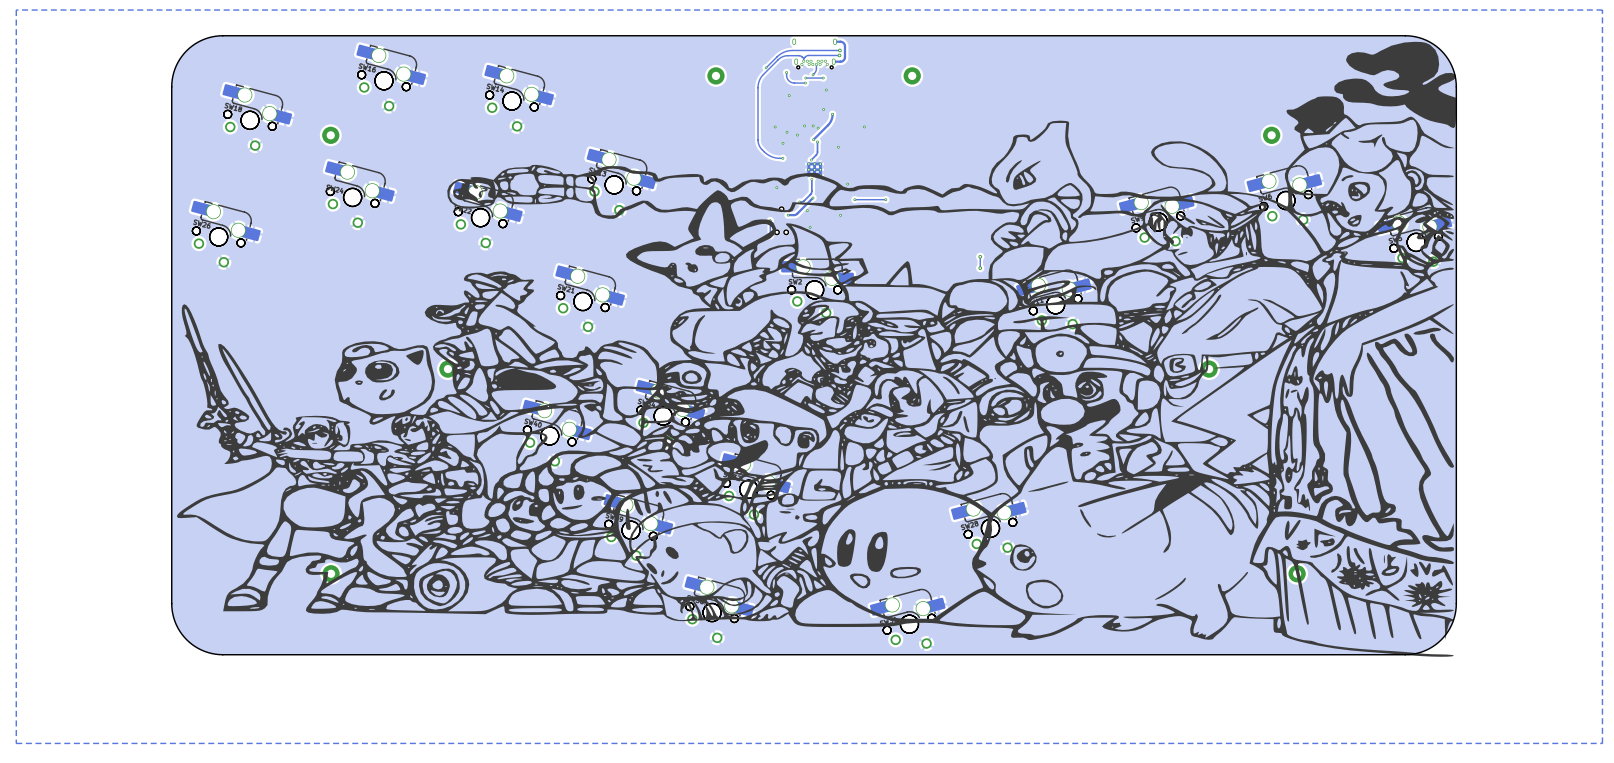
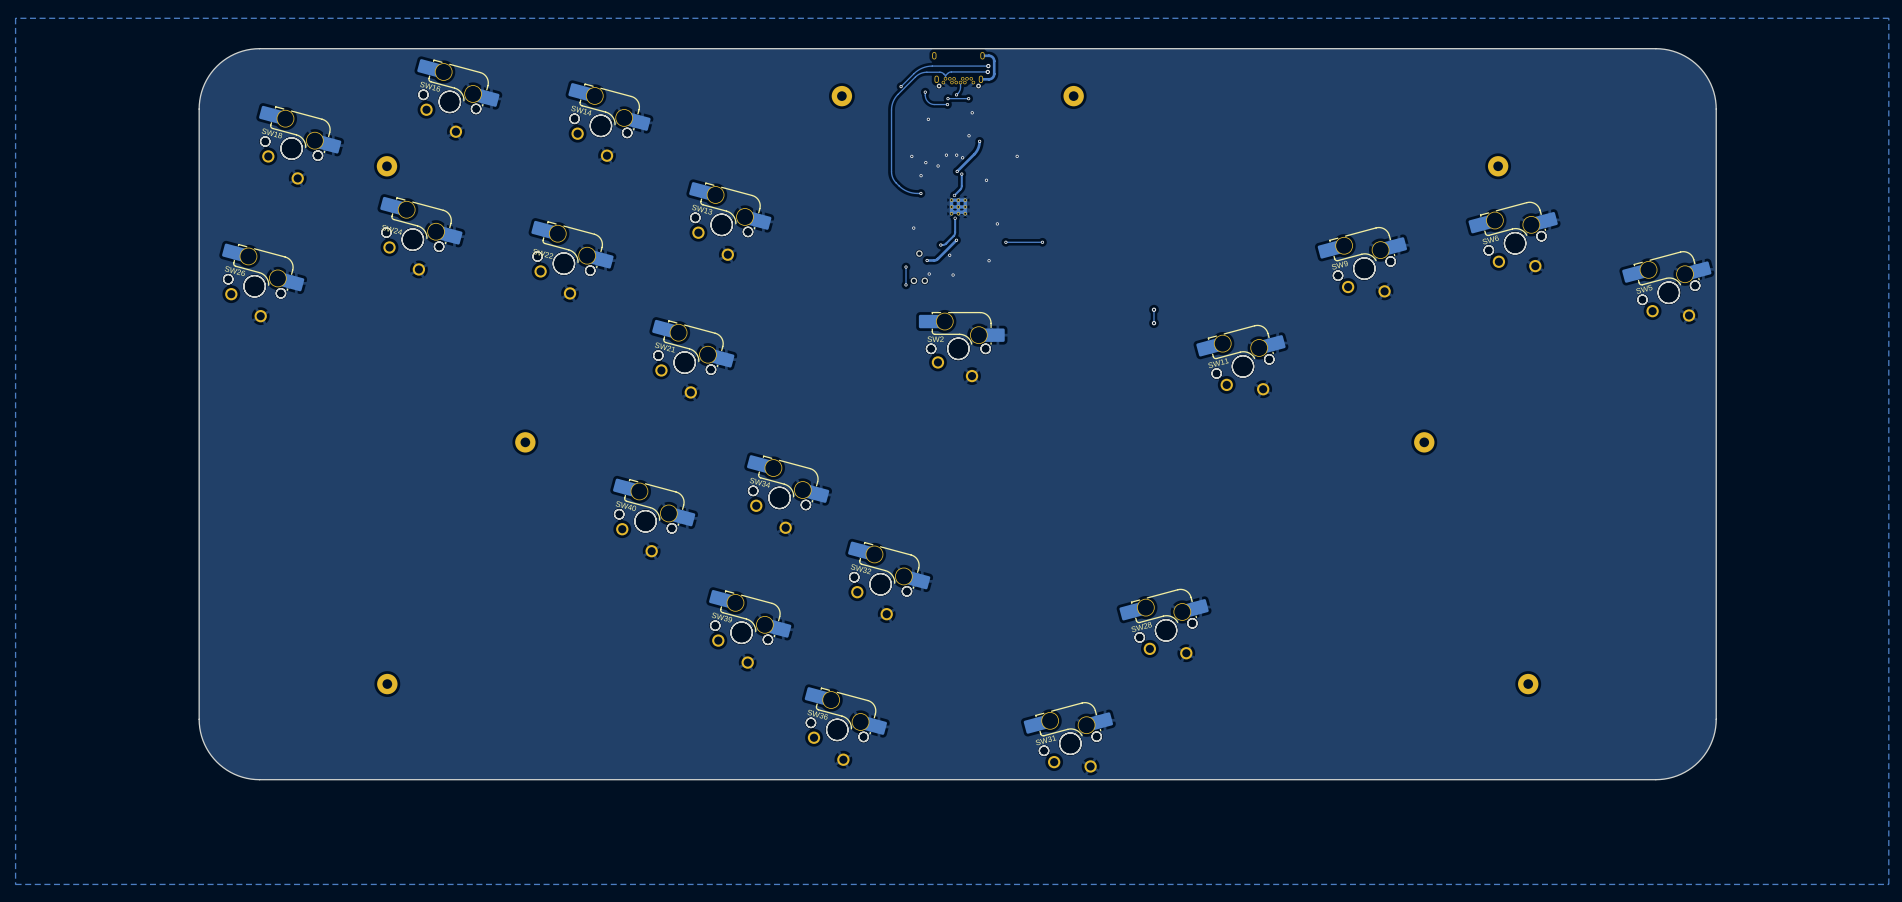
drawing: [177, 41, 1457, 657] -> none

